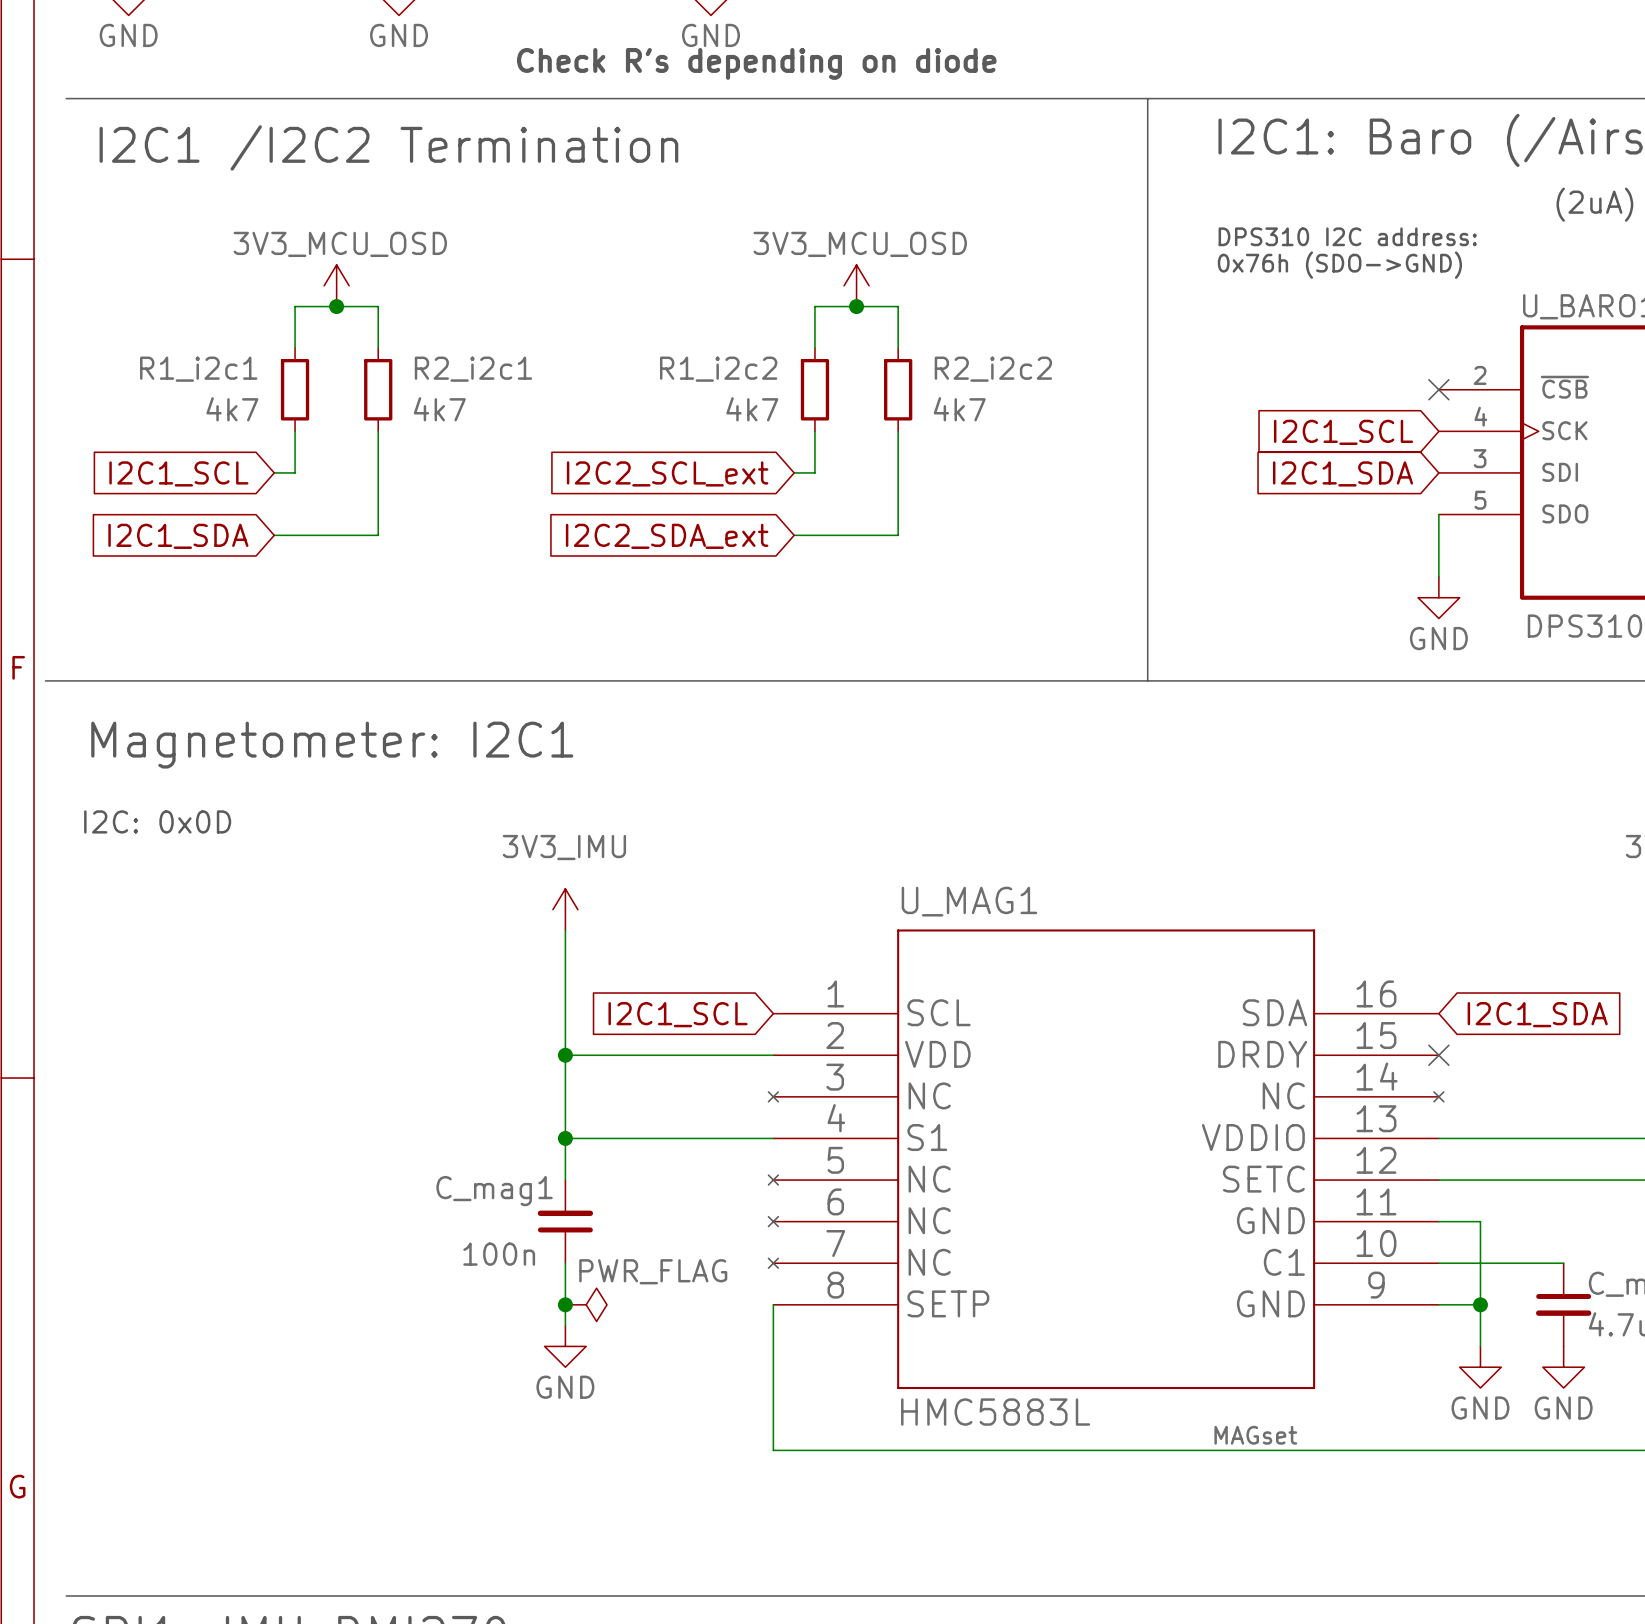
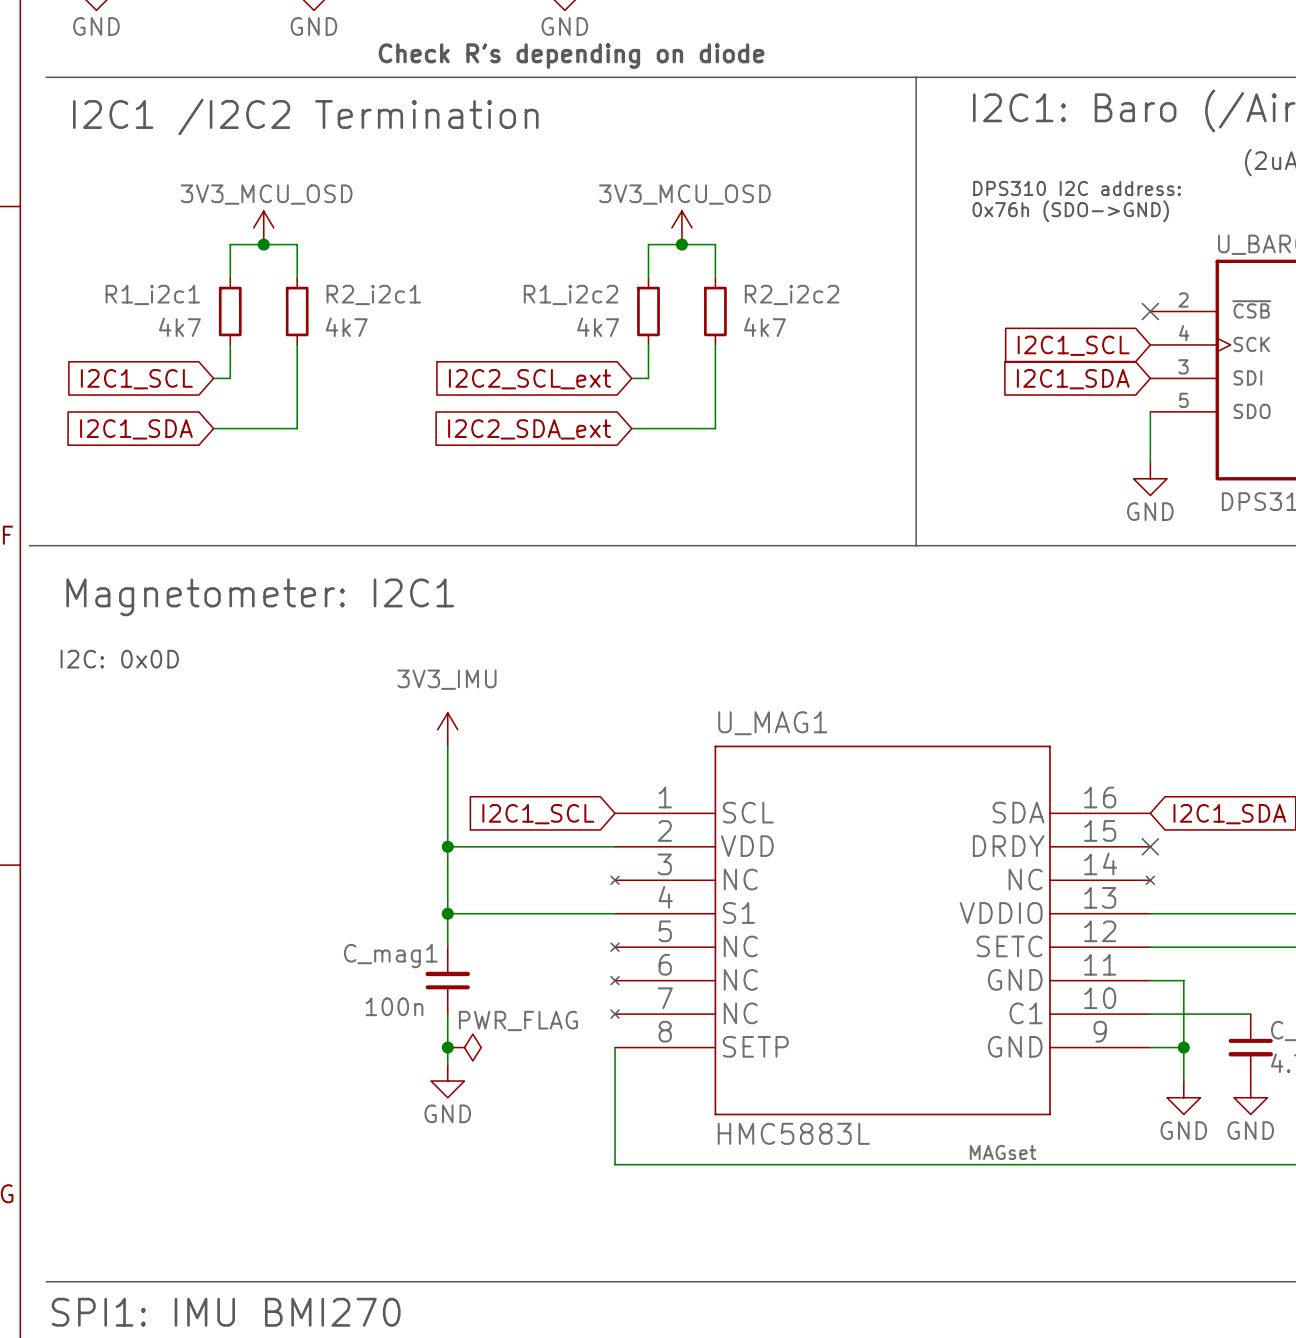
text position: Check R's depending on diode (756, 63) -> Check R's depending on diode (571, 56)

